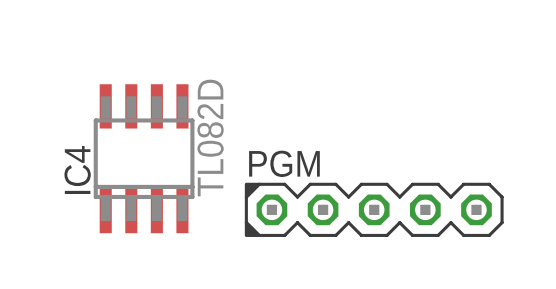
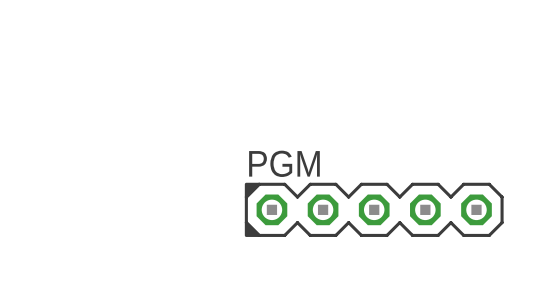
IC4: TL082D (144, 158) -> none

